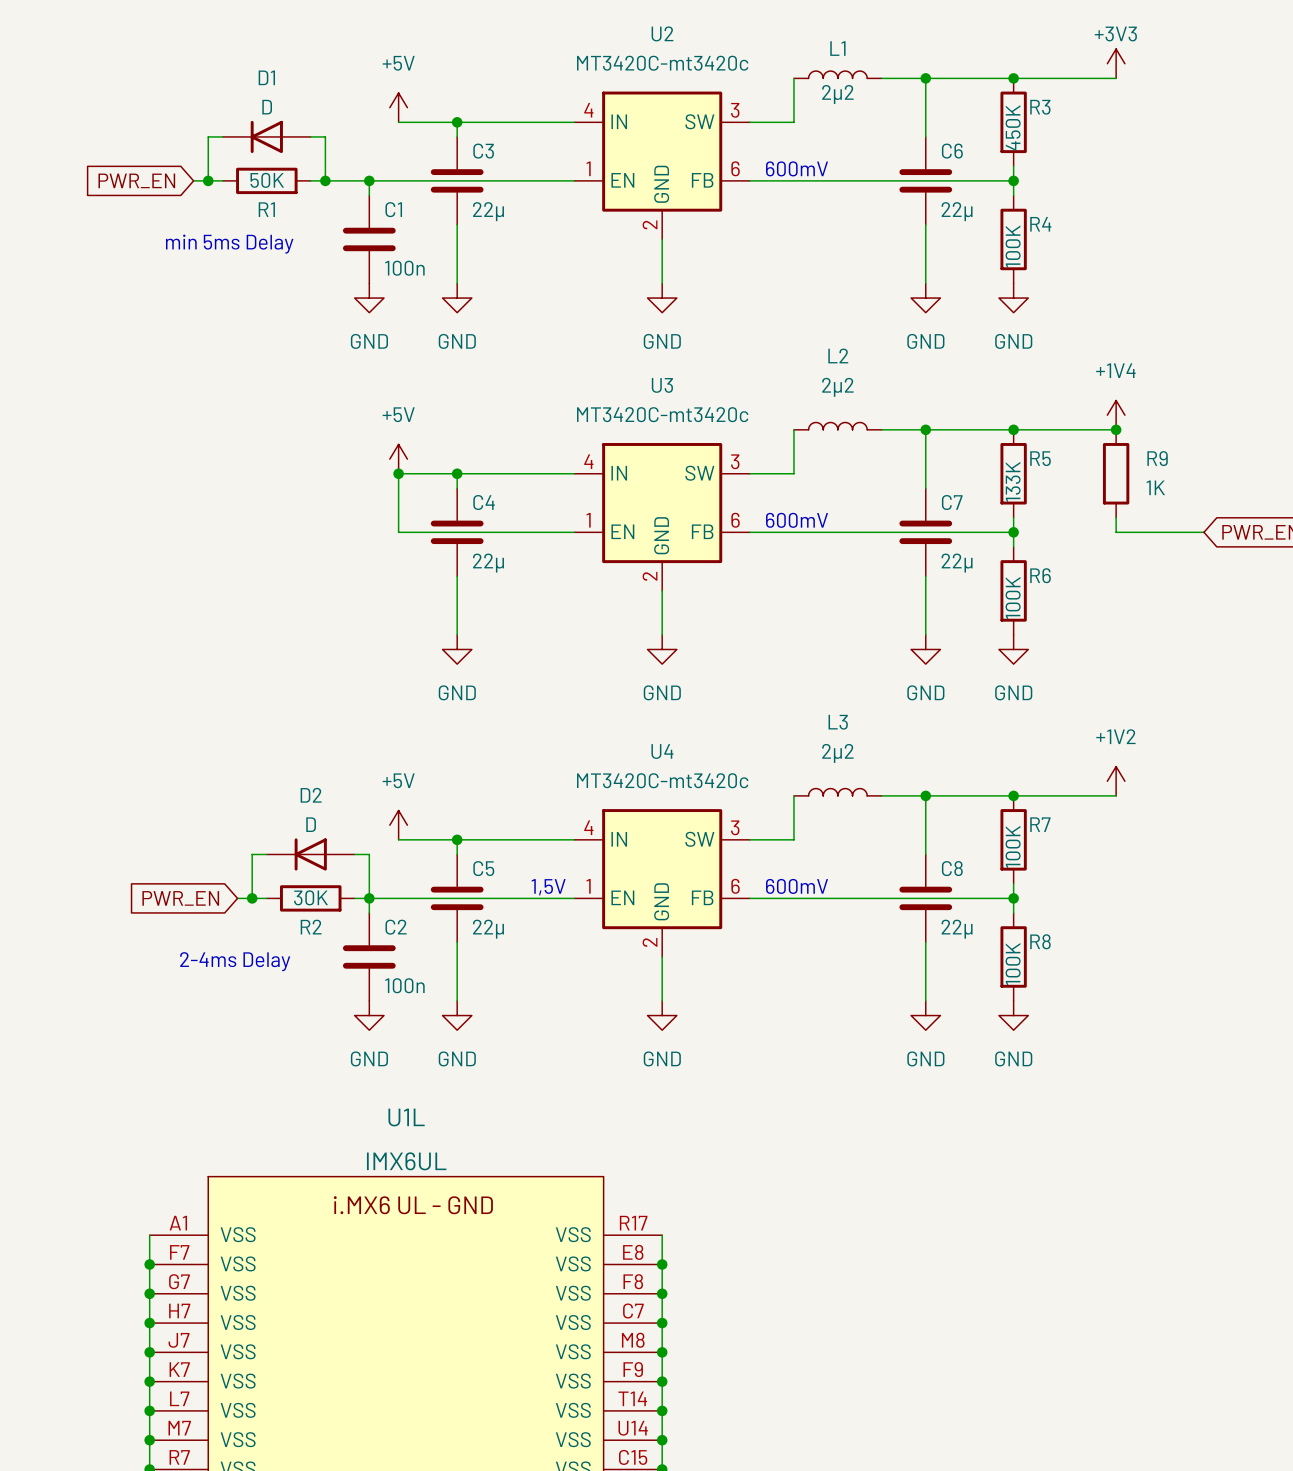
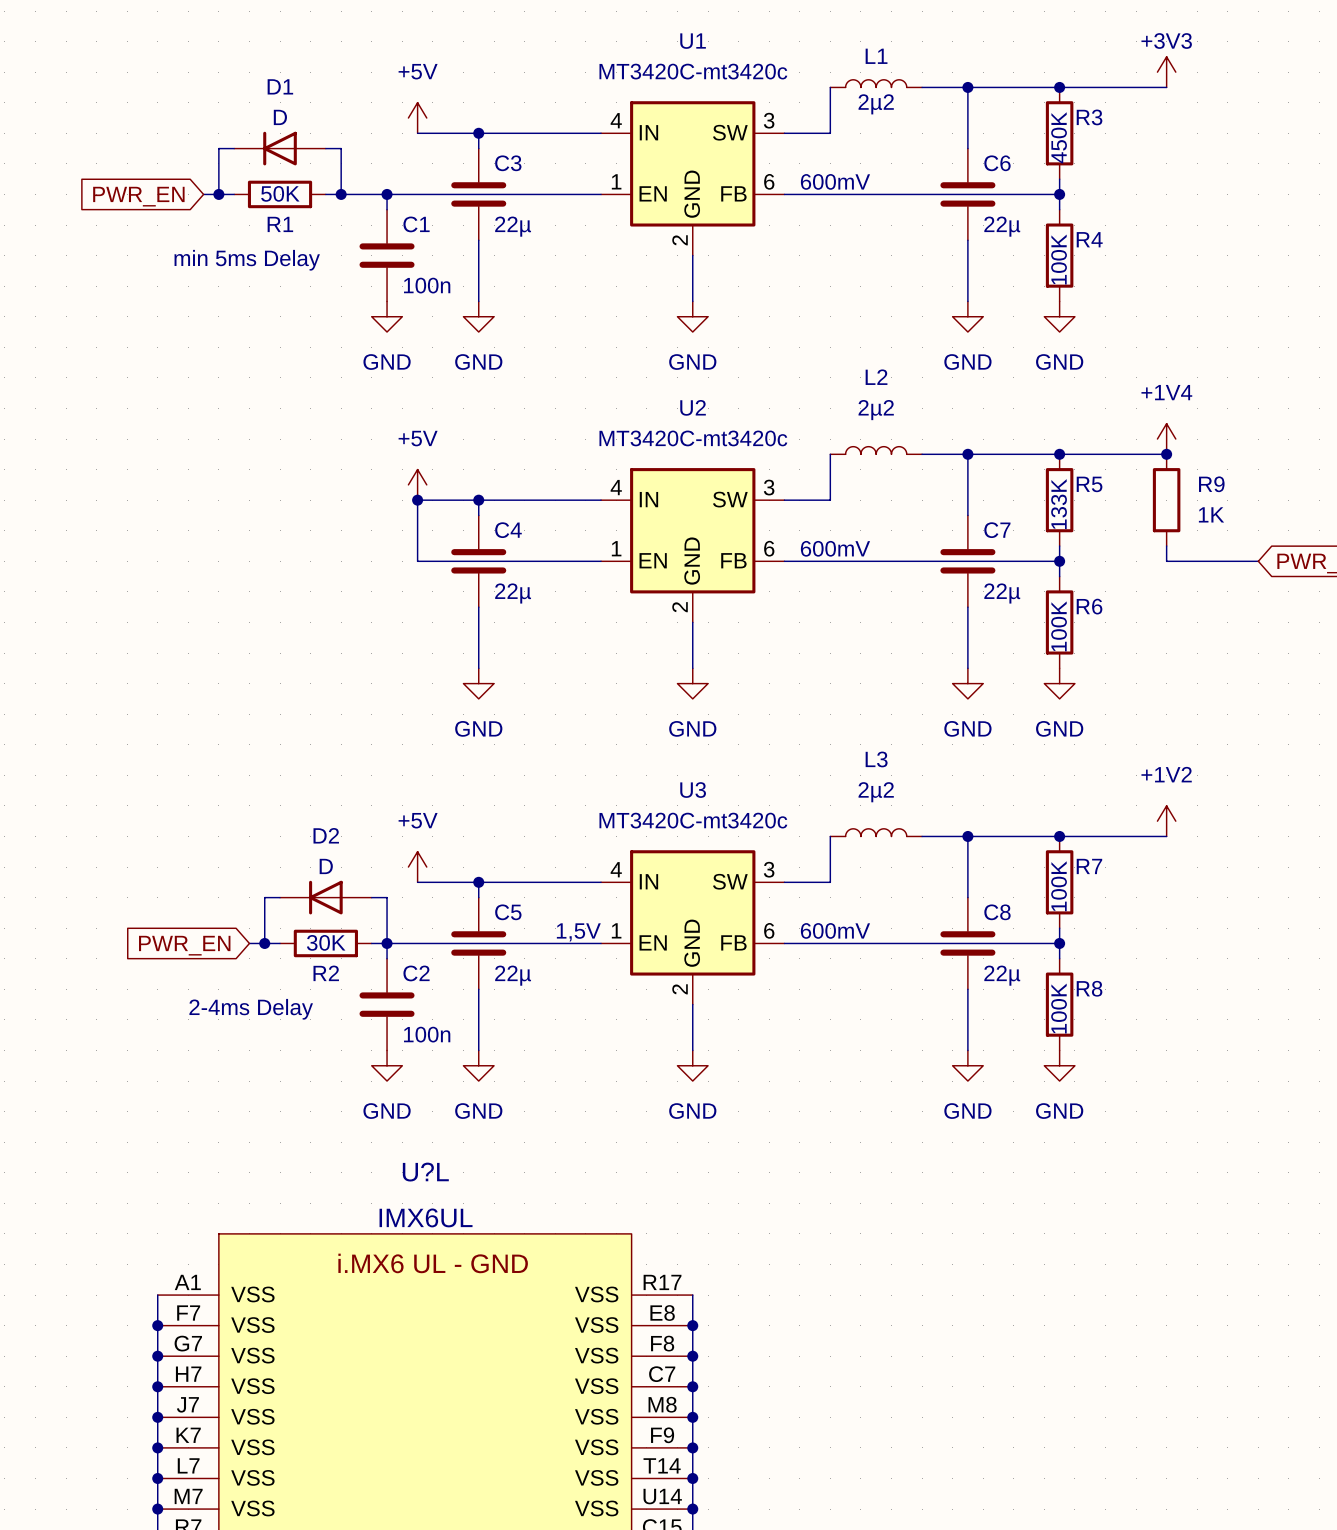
U2 name: U2 (662, 33) -> U1 (693, 41)
U3 name: U3 (662, 385) -> U2 (693, 407)
U4 name: U4 (662, 751) -> U3 (693, 790)
U1L name: U1L (406, 1117) -> U?L (425, 1172)

